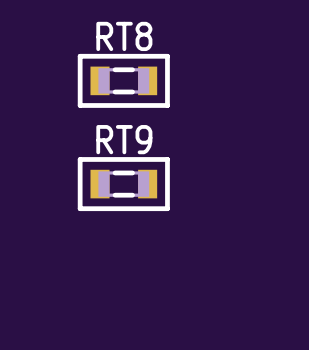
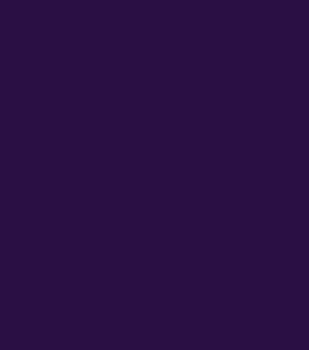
RT8: (123, 80) -> none
RT9: (123, 184) -> none

